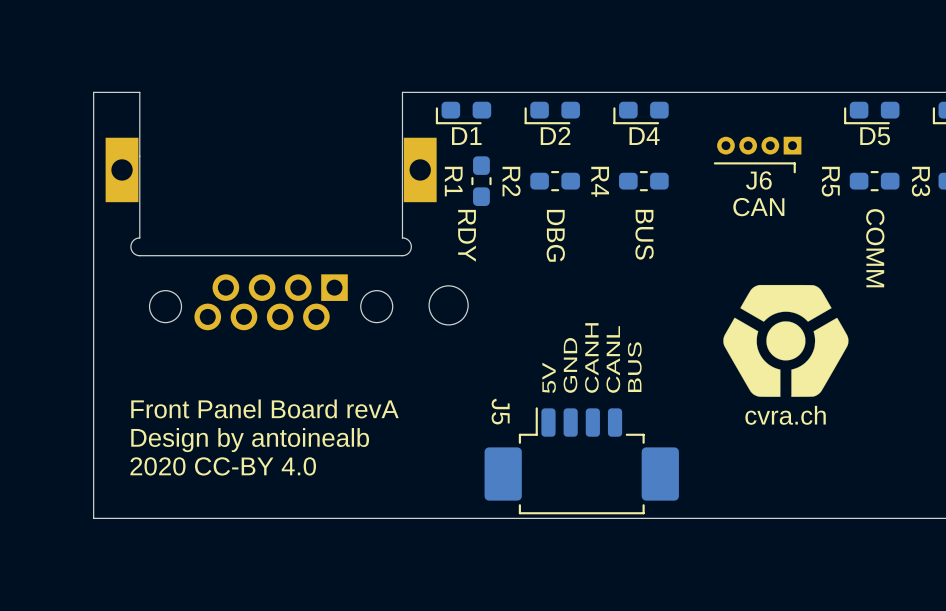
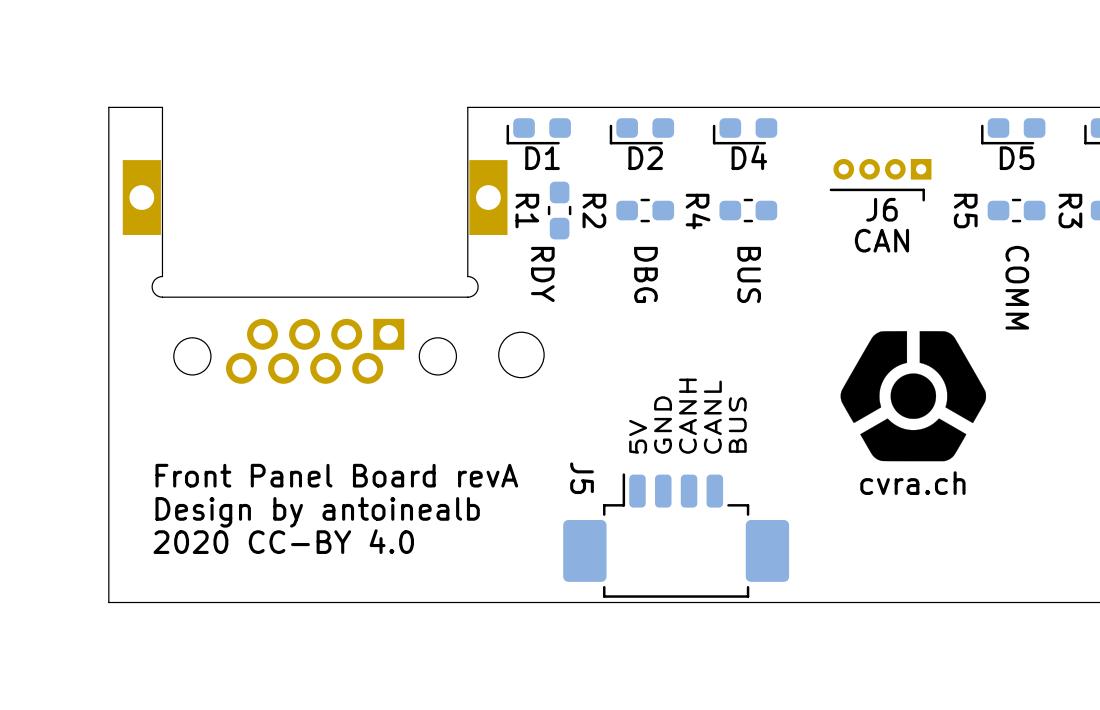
drawing shape: [723, 284, 849, 397] -> [840, 331, 987, 462]

